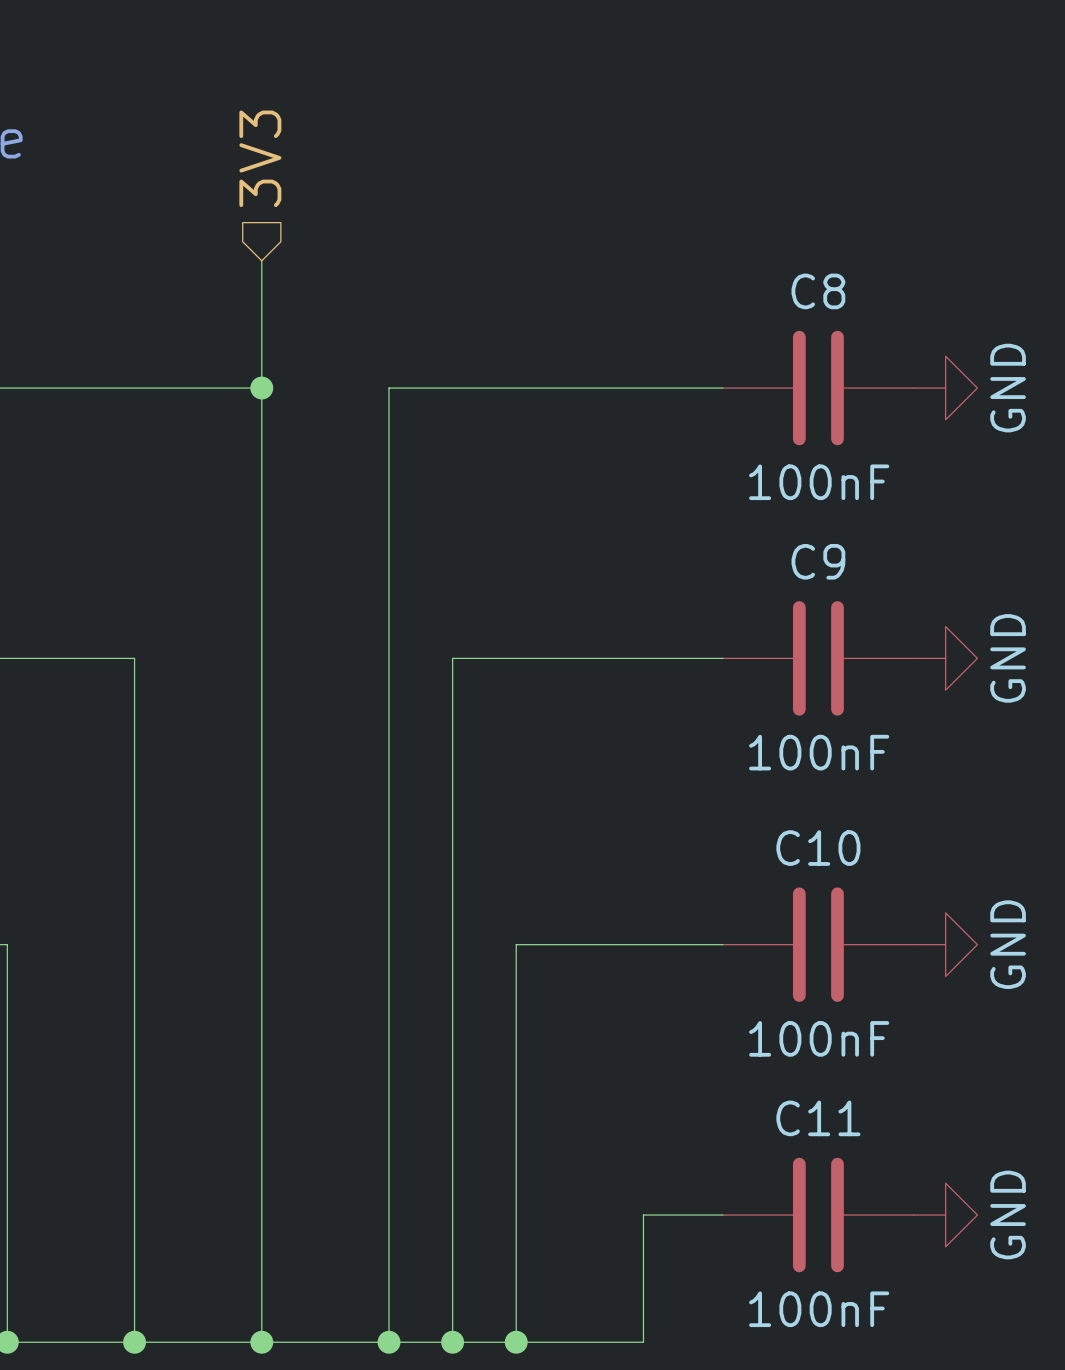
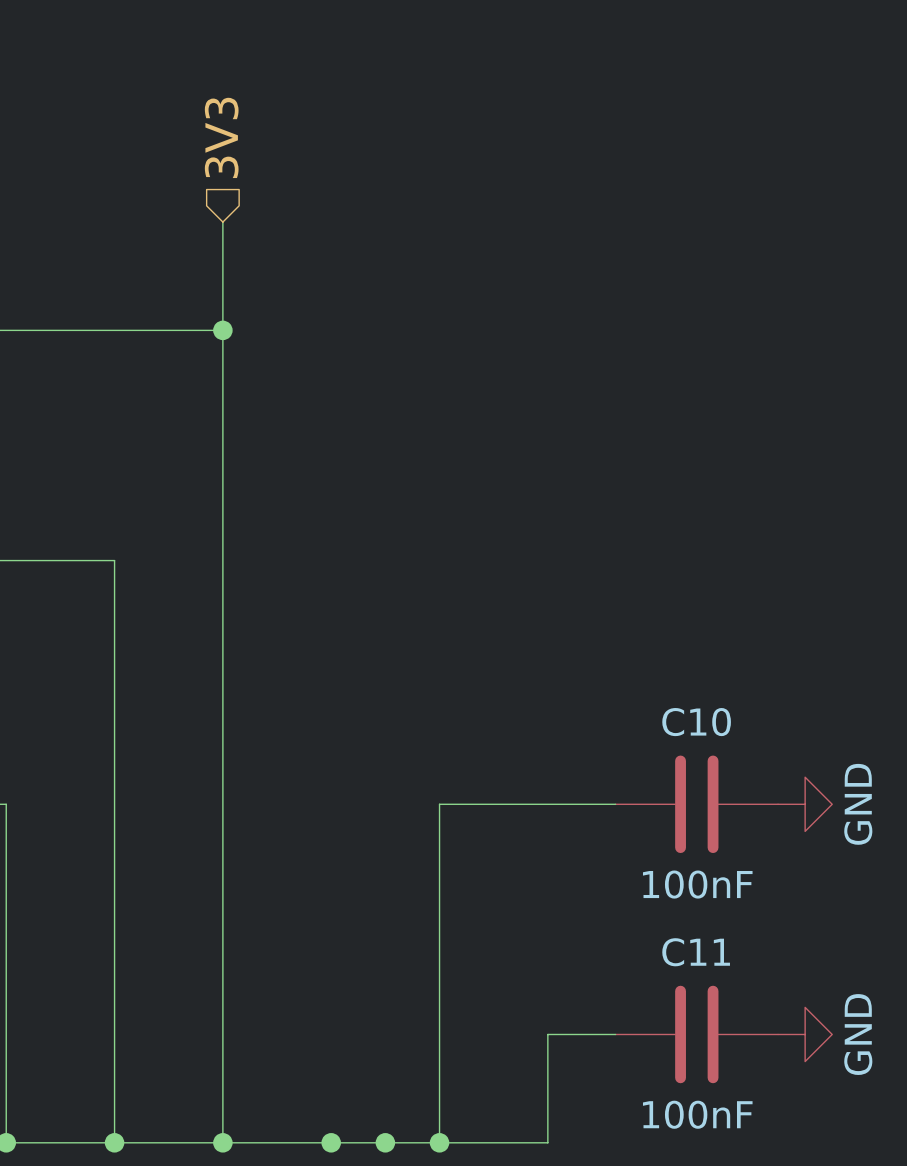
wire: (722, 388) (389, 388) (389, 1342) -> none
C8: 100nF (818, 388) -> none
power symbol: GND (945, 388) -> none
wire: (722, 658) (452, 658) (452, 1342) -> none
C9: 100nF (818, 658) -> none
power symbol: GND (945, 658) -> none

